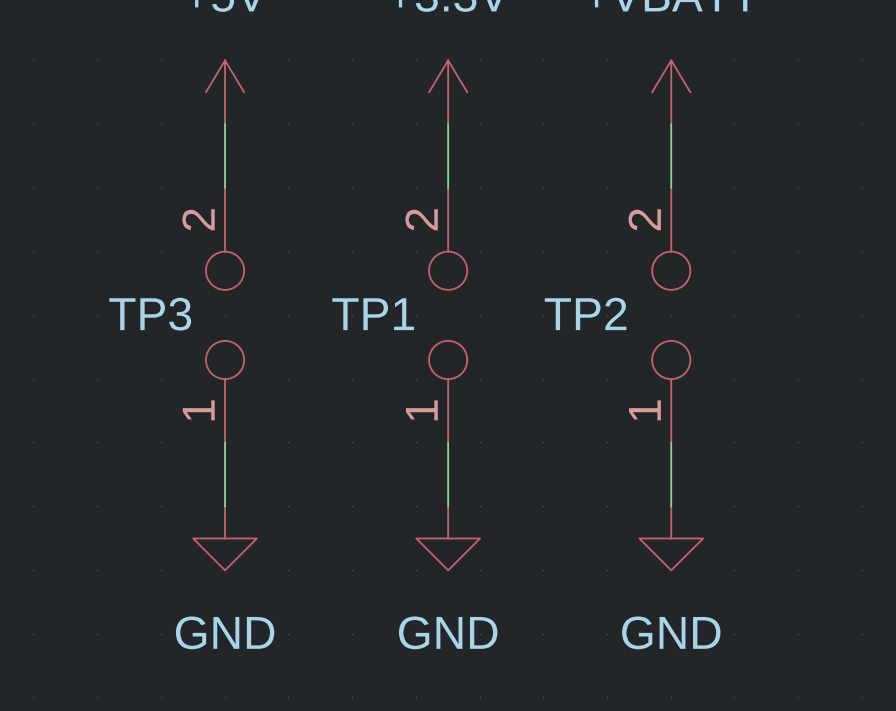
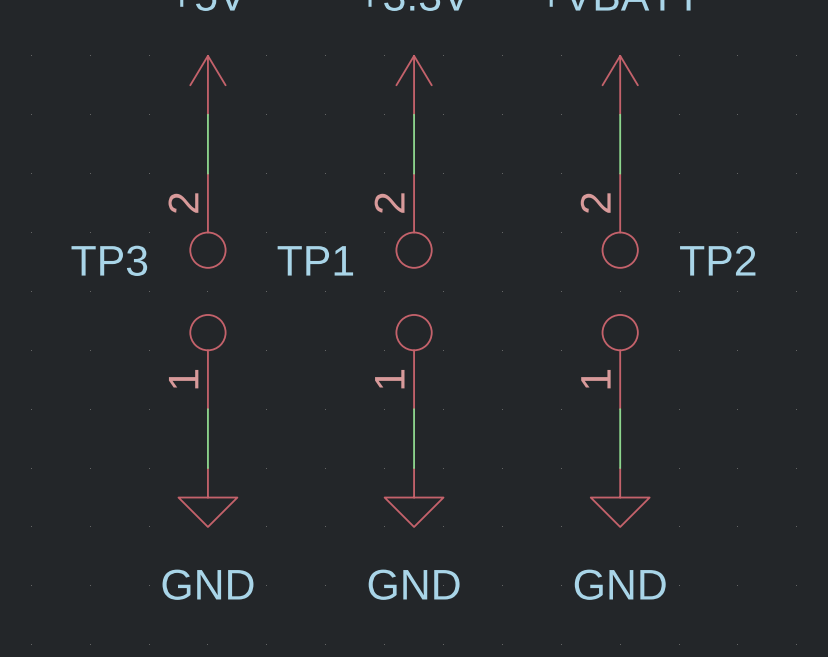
TP2 name position: TP2 (585, 313) -> TP2 (717, 260)
TP3 name position: TP3 (150, 314) -> TP3 (109, 260)
TP1 name position: TP1 (373, 314) -> TP1 (315, 260)

